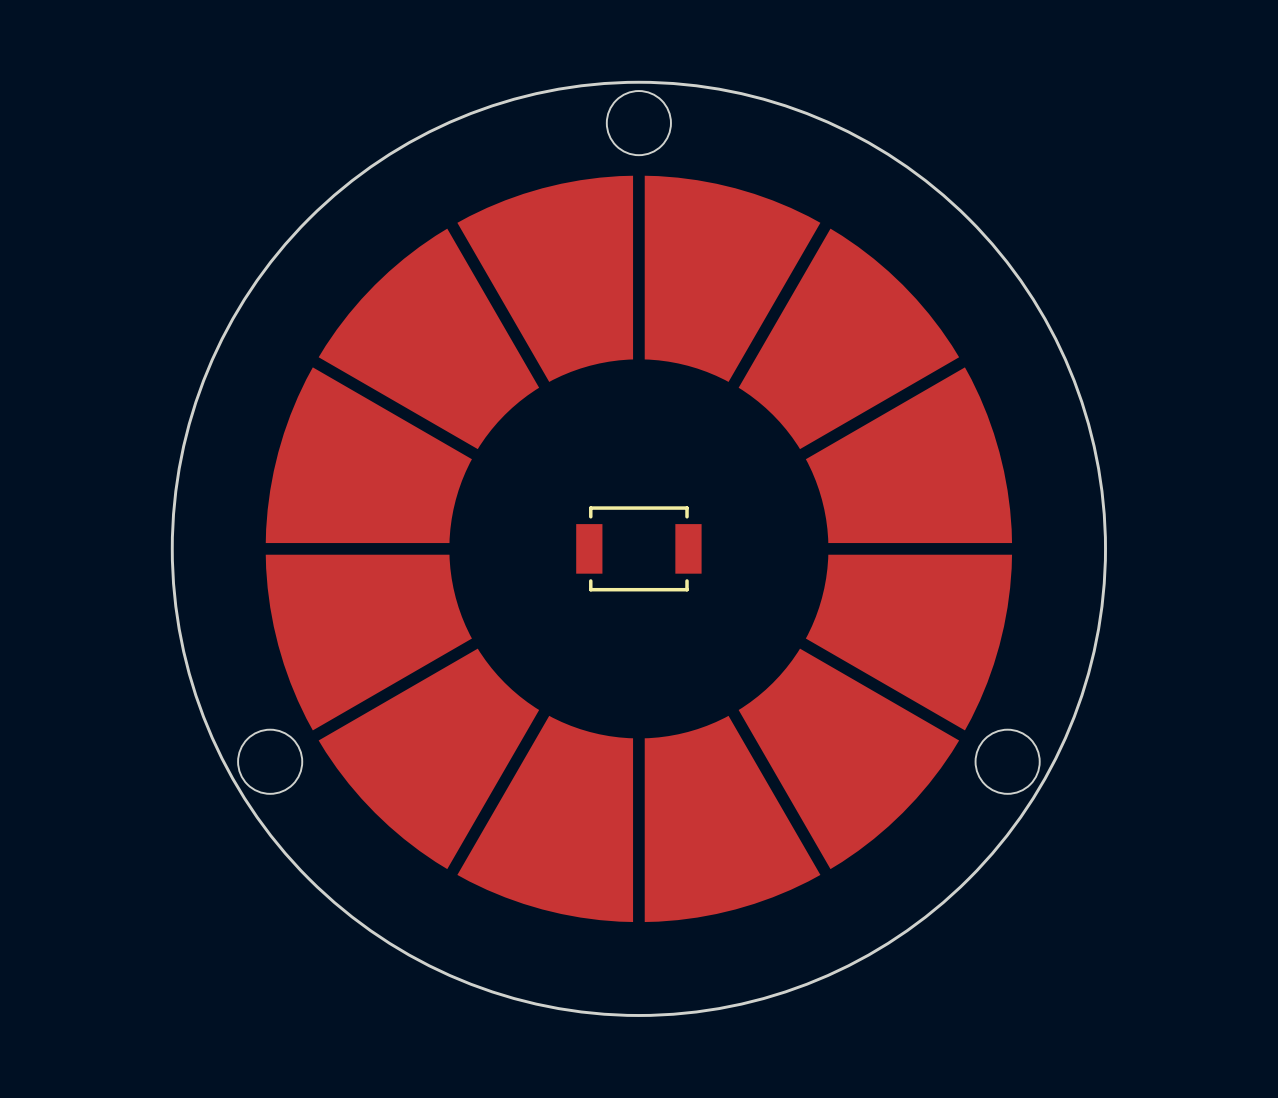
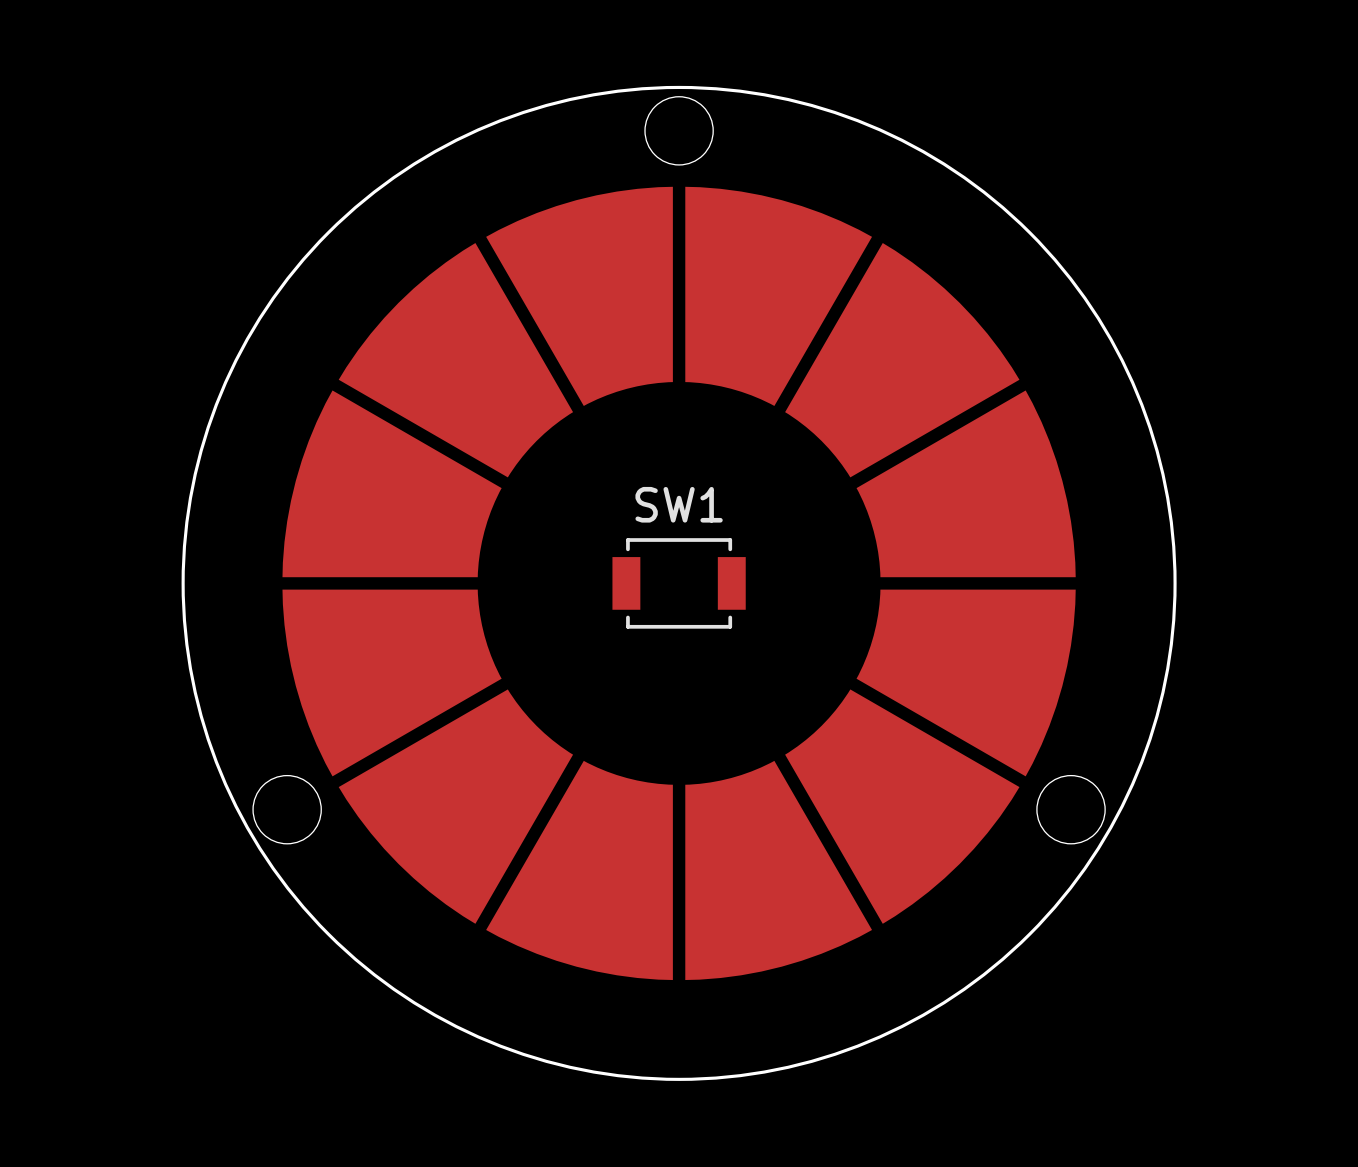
SW1 name: none -> SW1 (679, 504)

